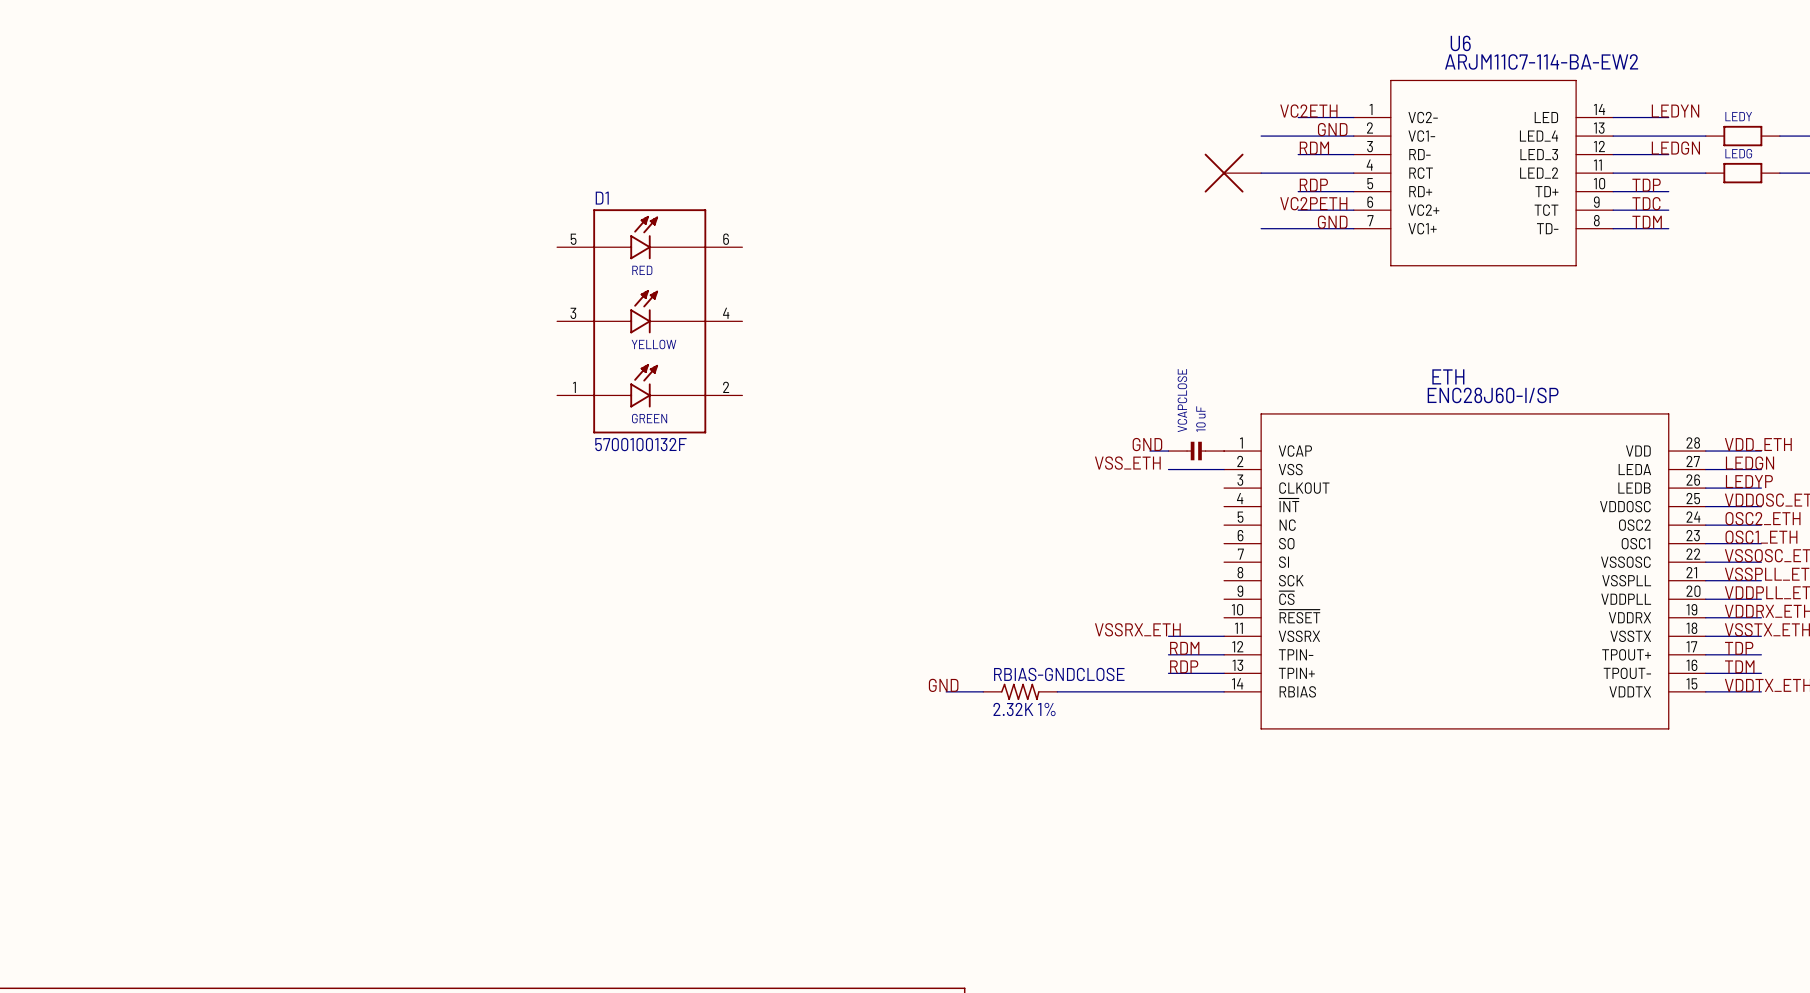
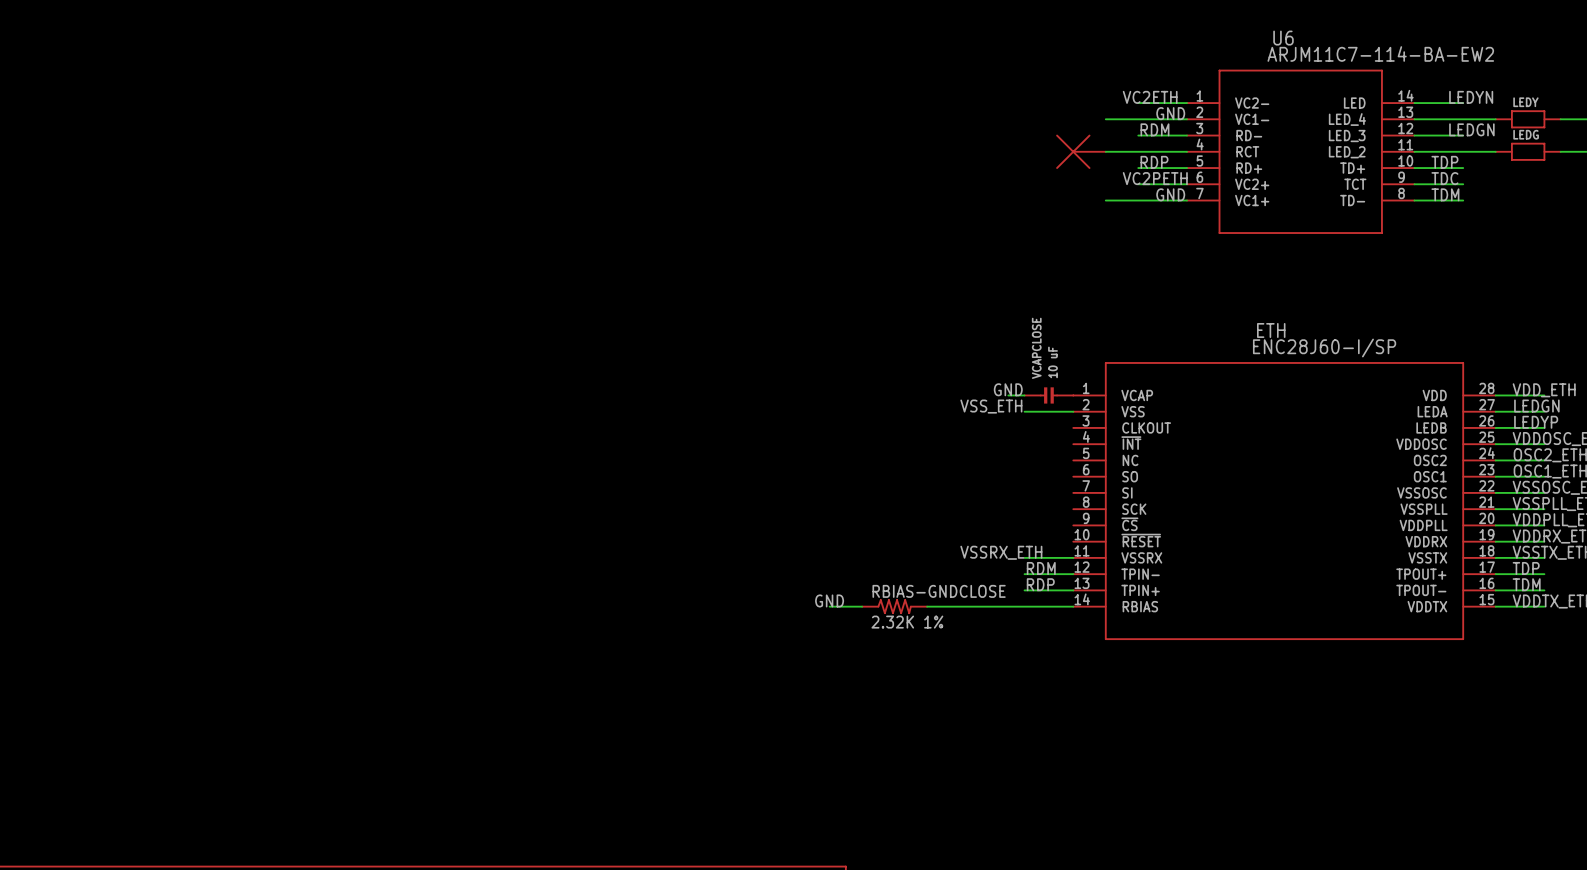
D1: 5700100132F (649, 321) -> none

